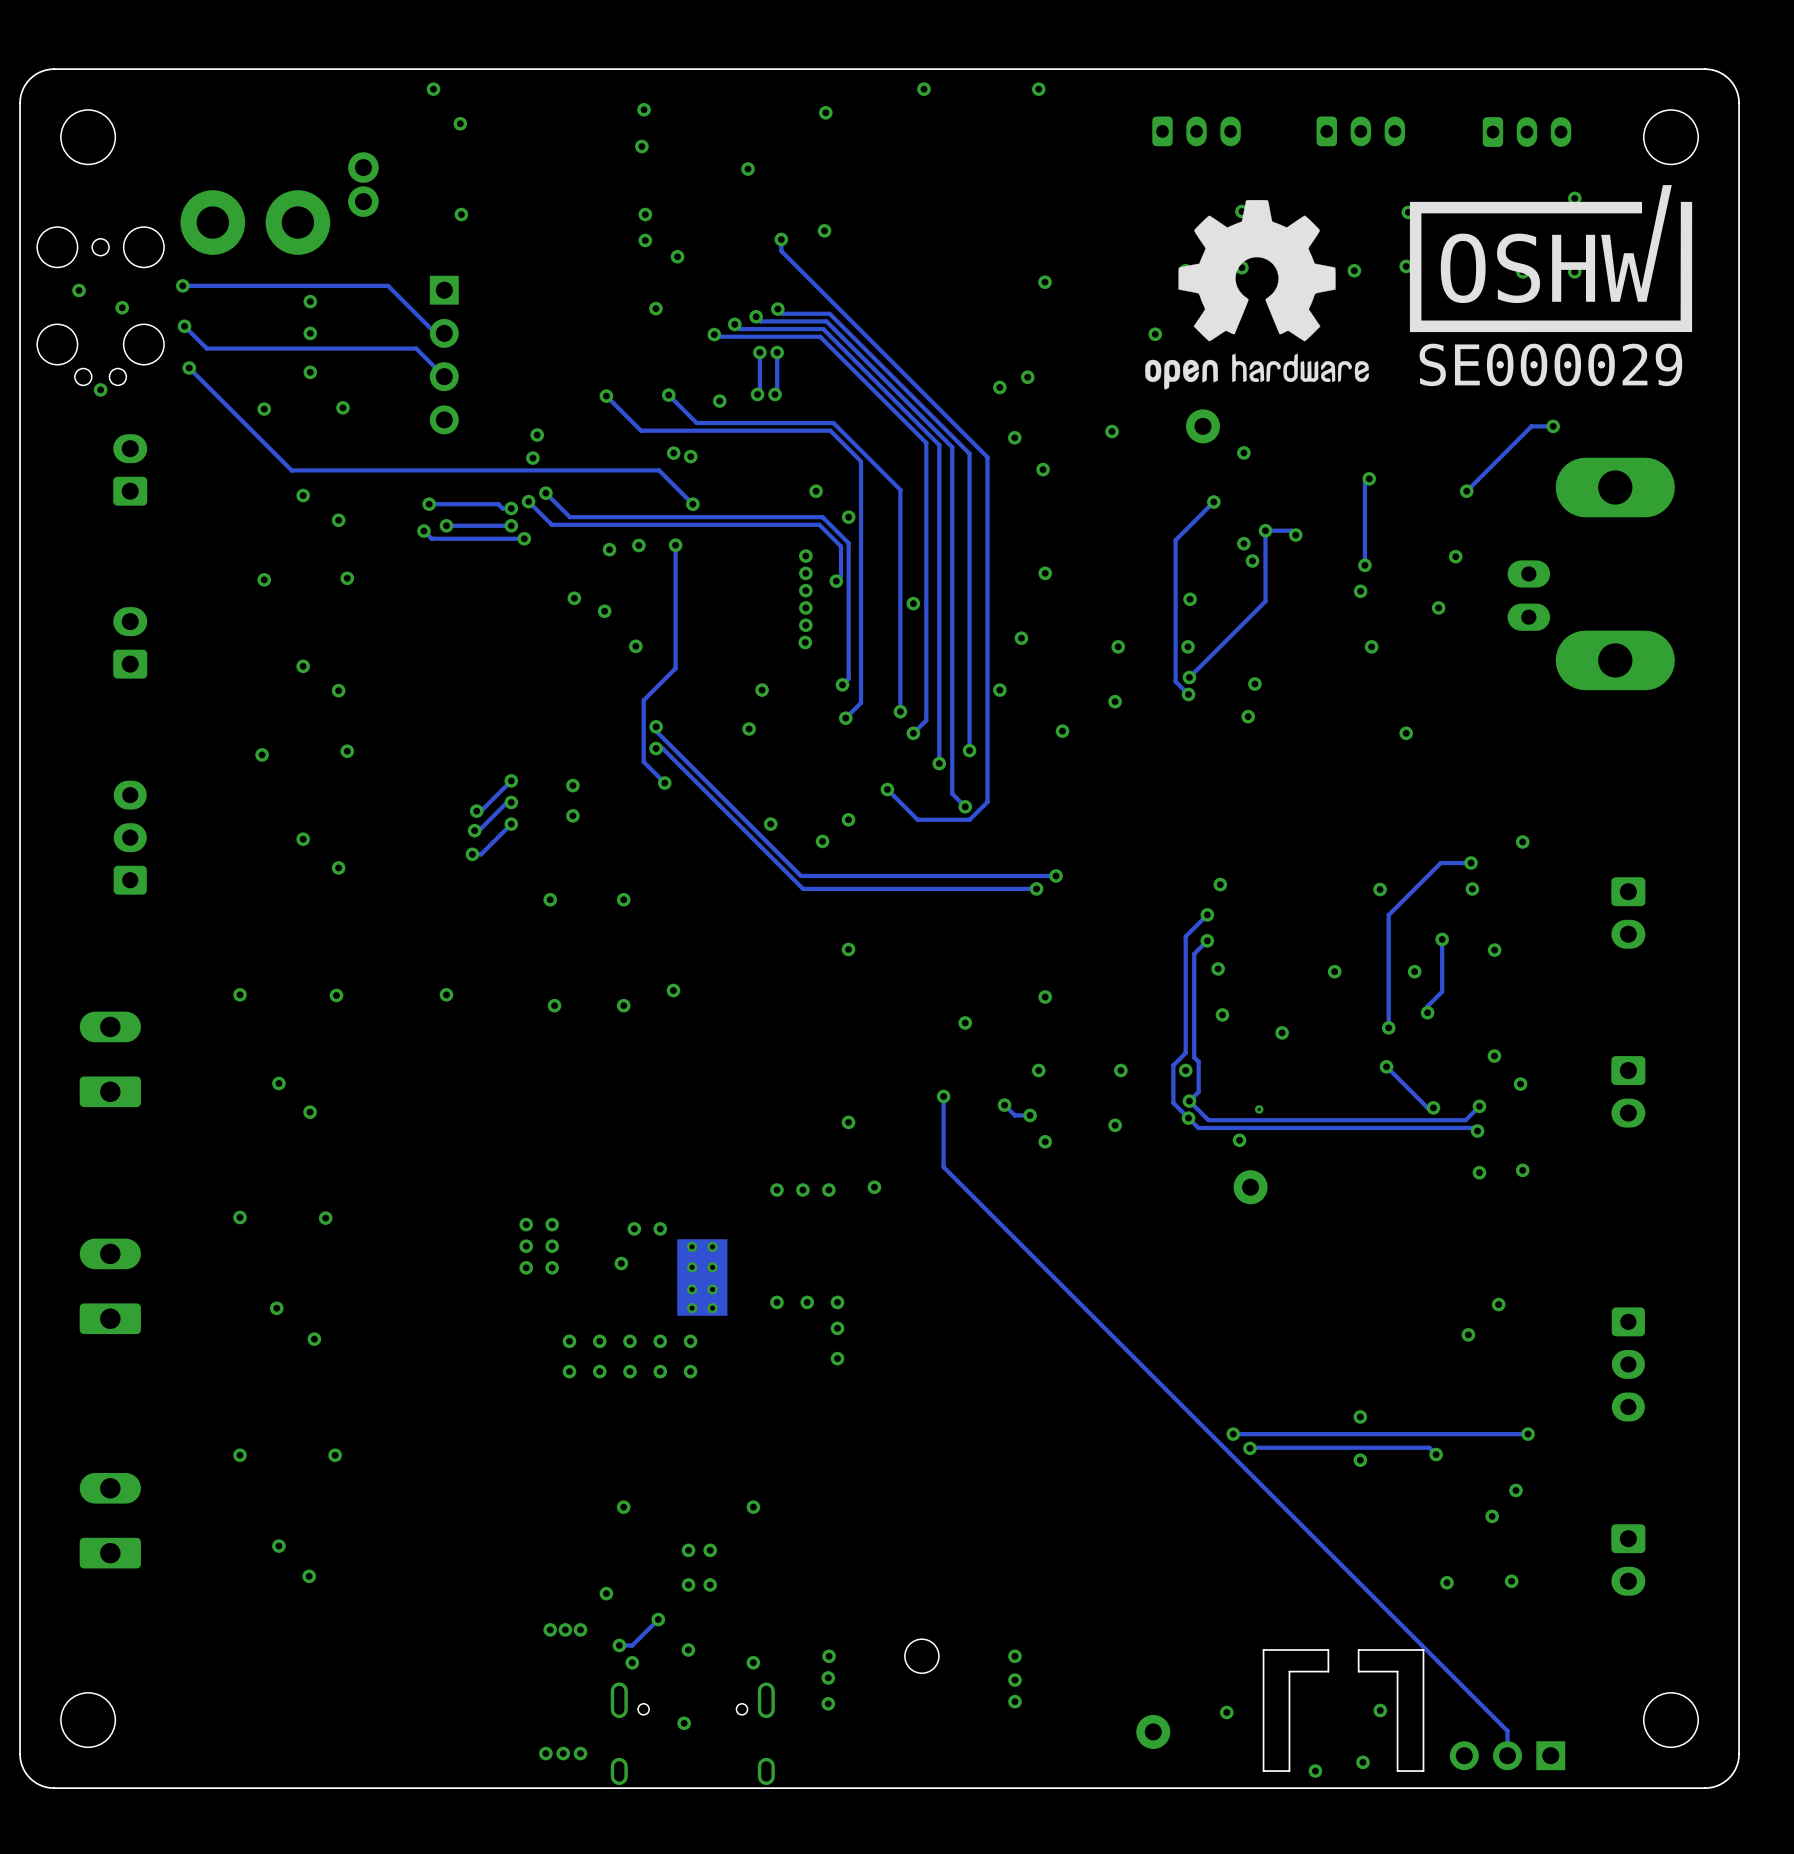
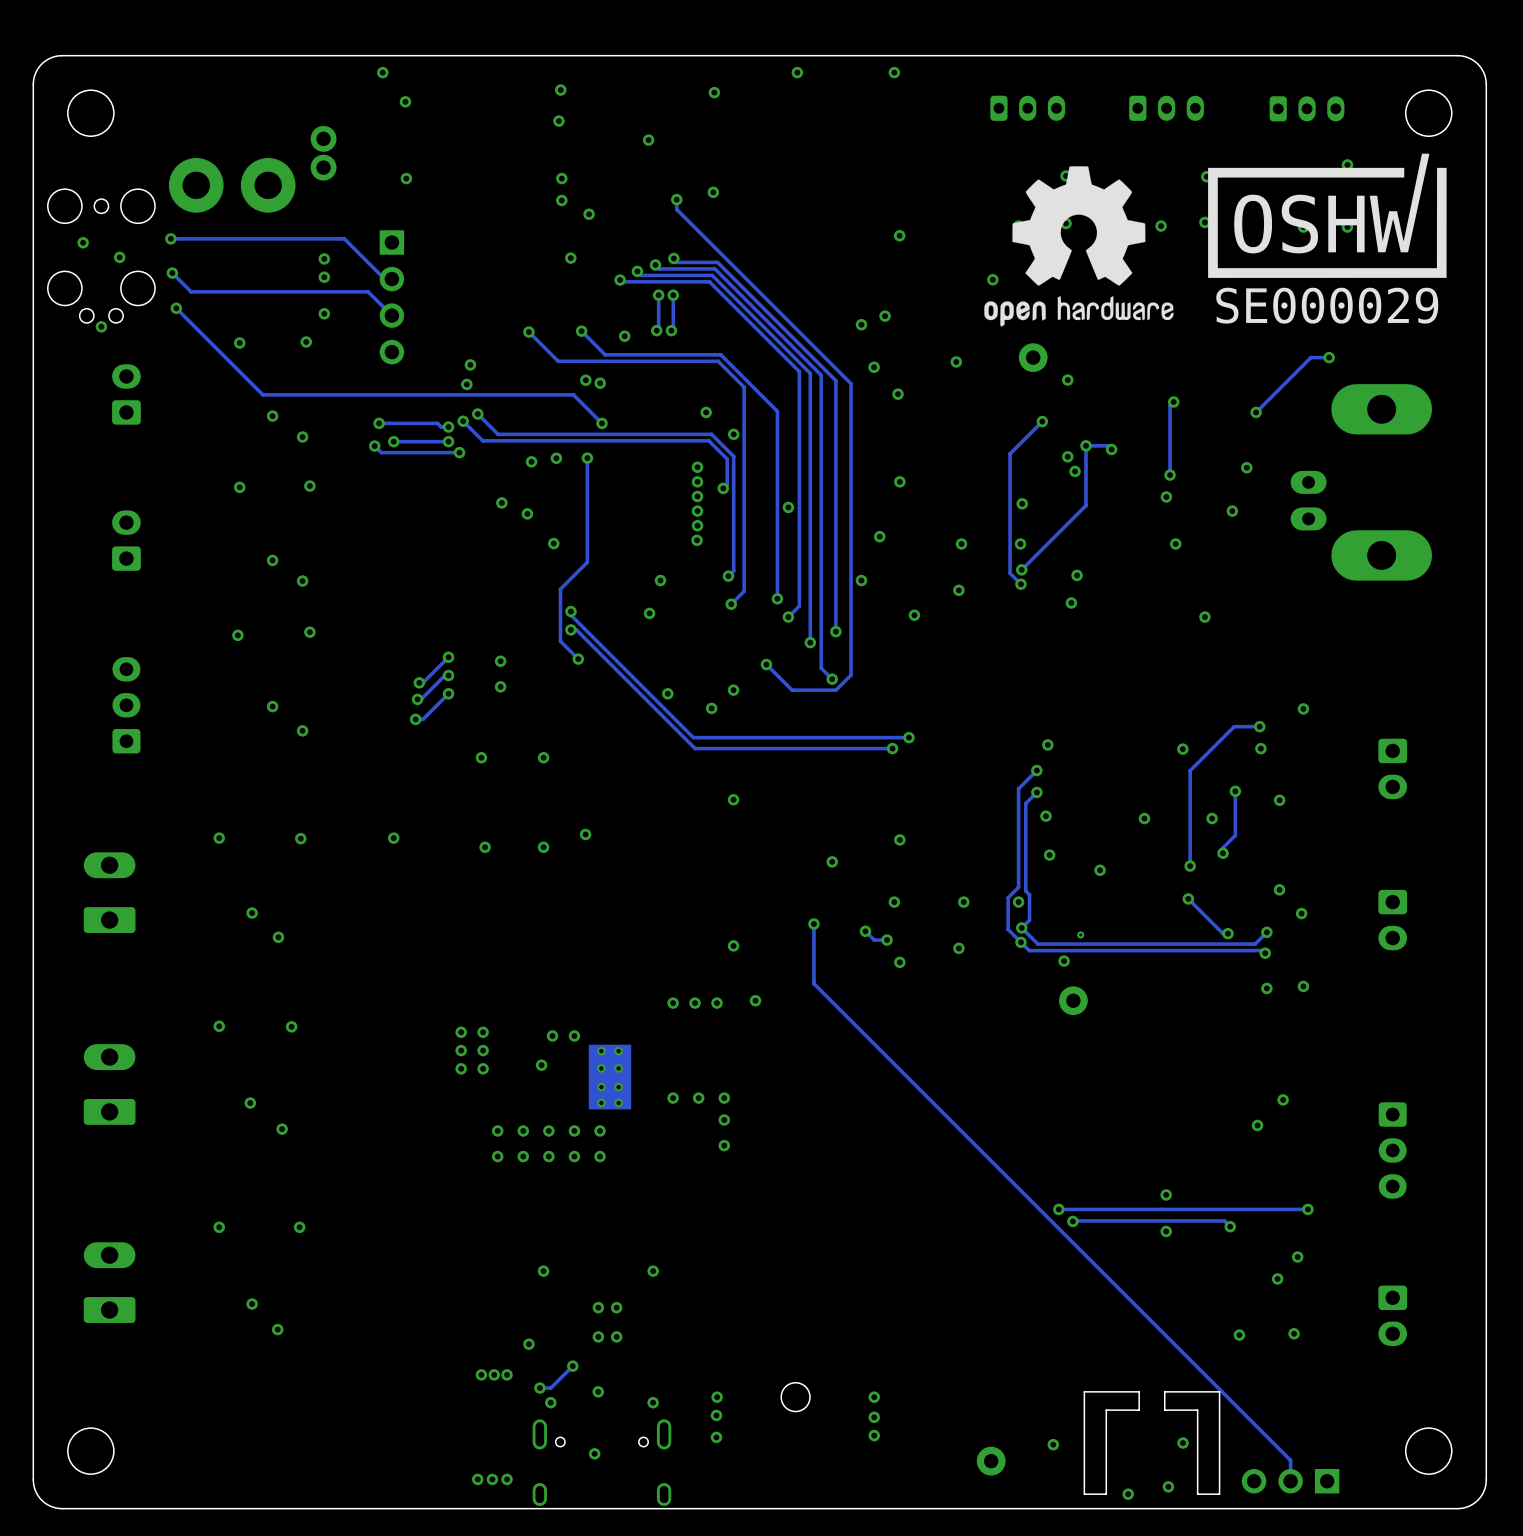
via: (310, 301) -> none
via: none -> (324, 258)
via: none -> (324, 277)
via: (310, 333) -> none
via: (310, 372) -> none
via: none -> (324, 313)

